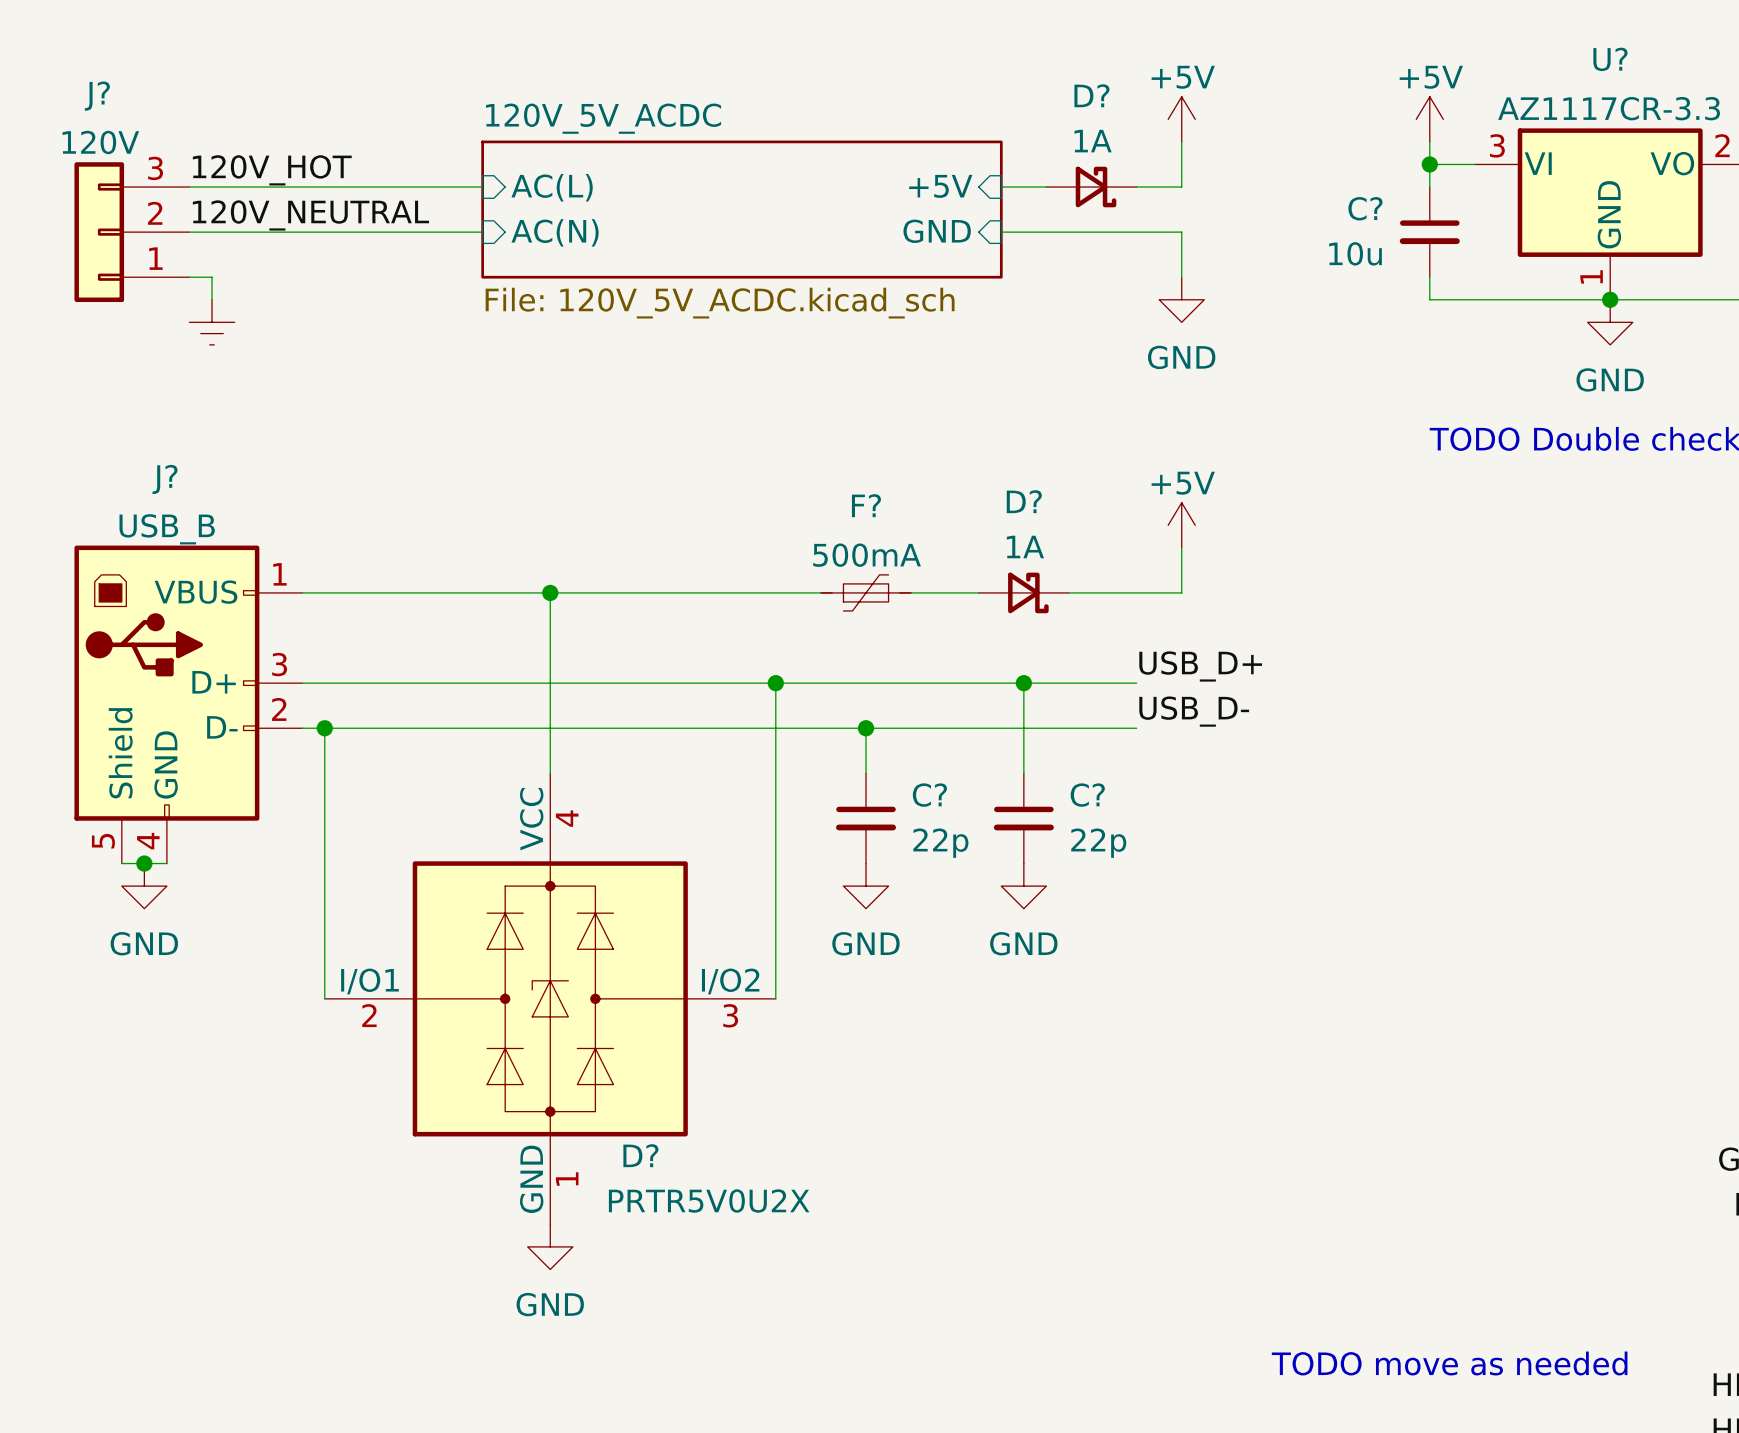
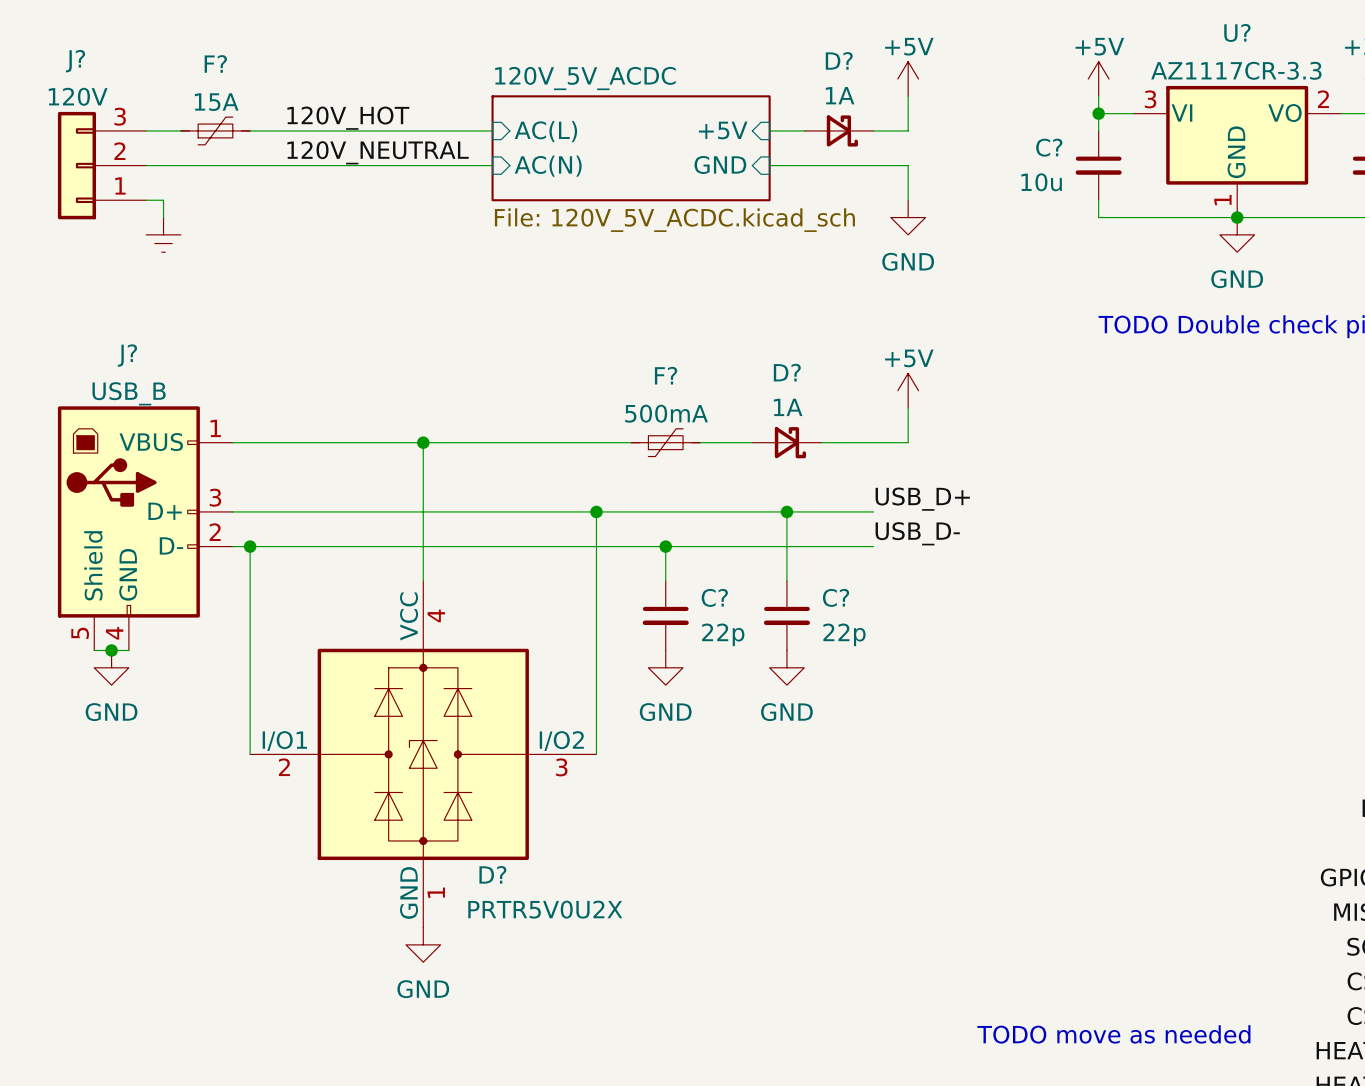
sheet 120V_5V_ACDC name position: 120V_5V_ACDC (603, 118) -> 120V_5V_ACDC (585, 78)
sheet 120V_5V_ACDC shape: [481, 140, 1003, 279] -> [491, 95, 771, 202]
label position: 120V_HOT (272, 170) -> 120V_HOT (348, 118)
F?: none -> 15A (215, 130)
wire: none -> (371, 130) (492, 130)
sheet pin position: AC(L) (552, 187) -> AC(L) (545, 131)
label position: 120V_NEUTRAL (310, 215) -> 120V_NEUTRAL (378, 152)
wire: none -> (371, 165) (492, 165)
sheet pin position: AC(N) (555, 232) -> AC(N) (548, 166)
sheet 120V_5V_ACDC value position: File: 120V_5V_ACDC.kicad_sch (720, 303) -> File: 120V_5V_ACDC.kicad_sch (674, 220)

